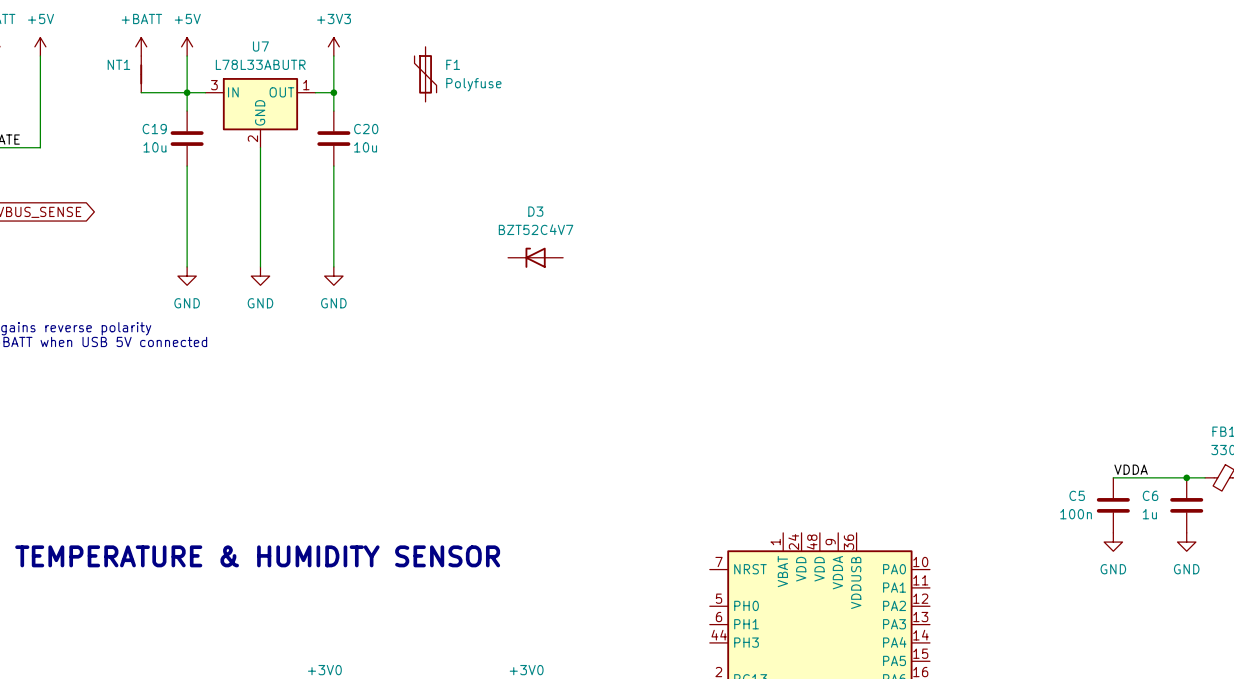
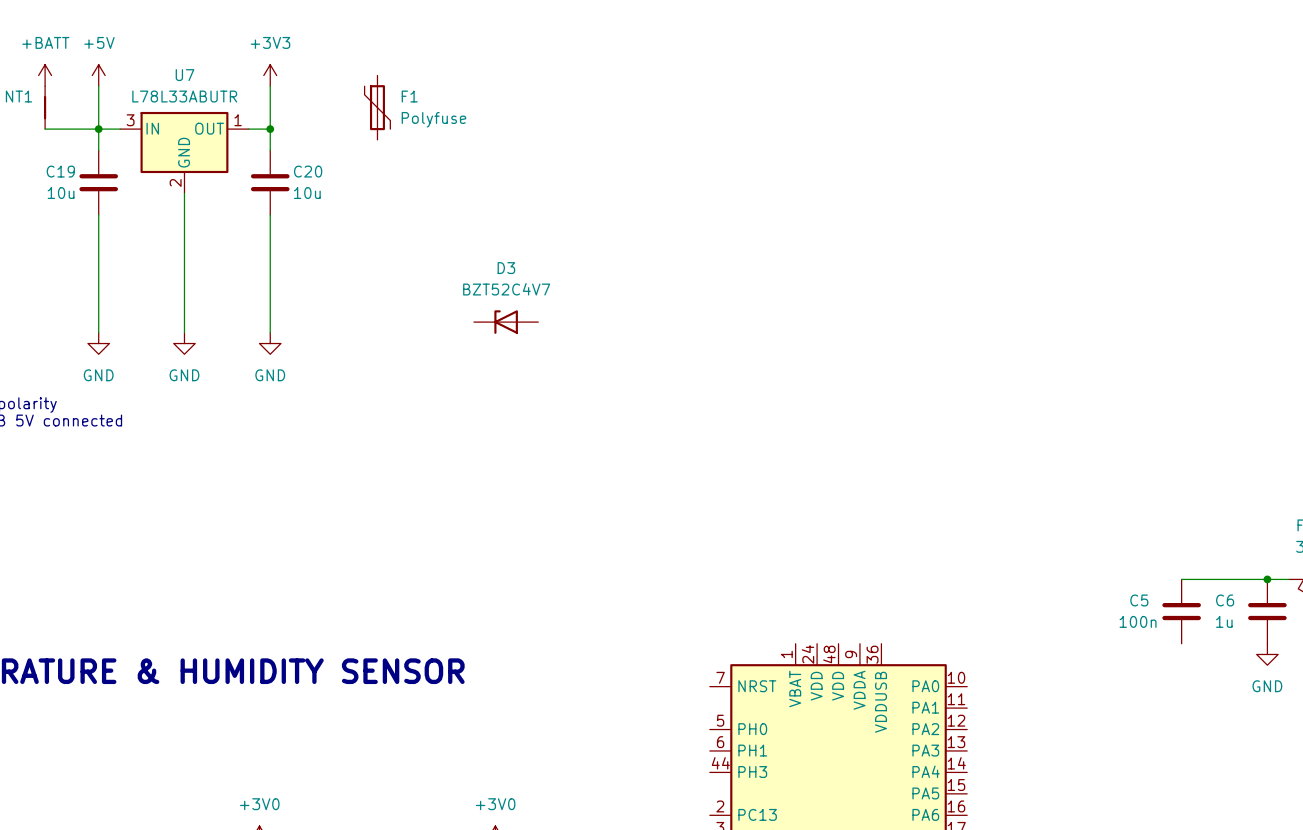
label: VDDA (1131, 469) -> none
power symbol: GND (1113, 542) -> none

